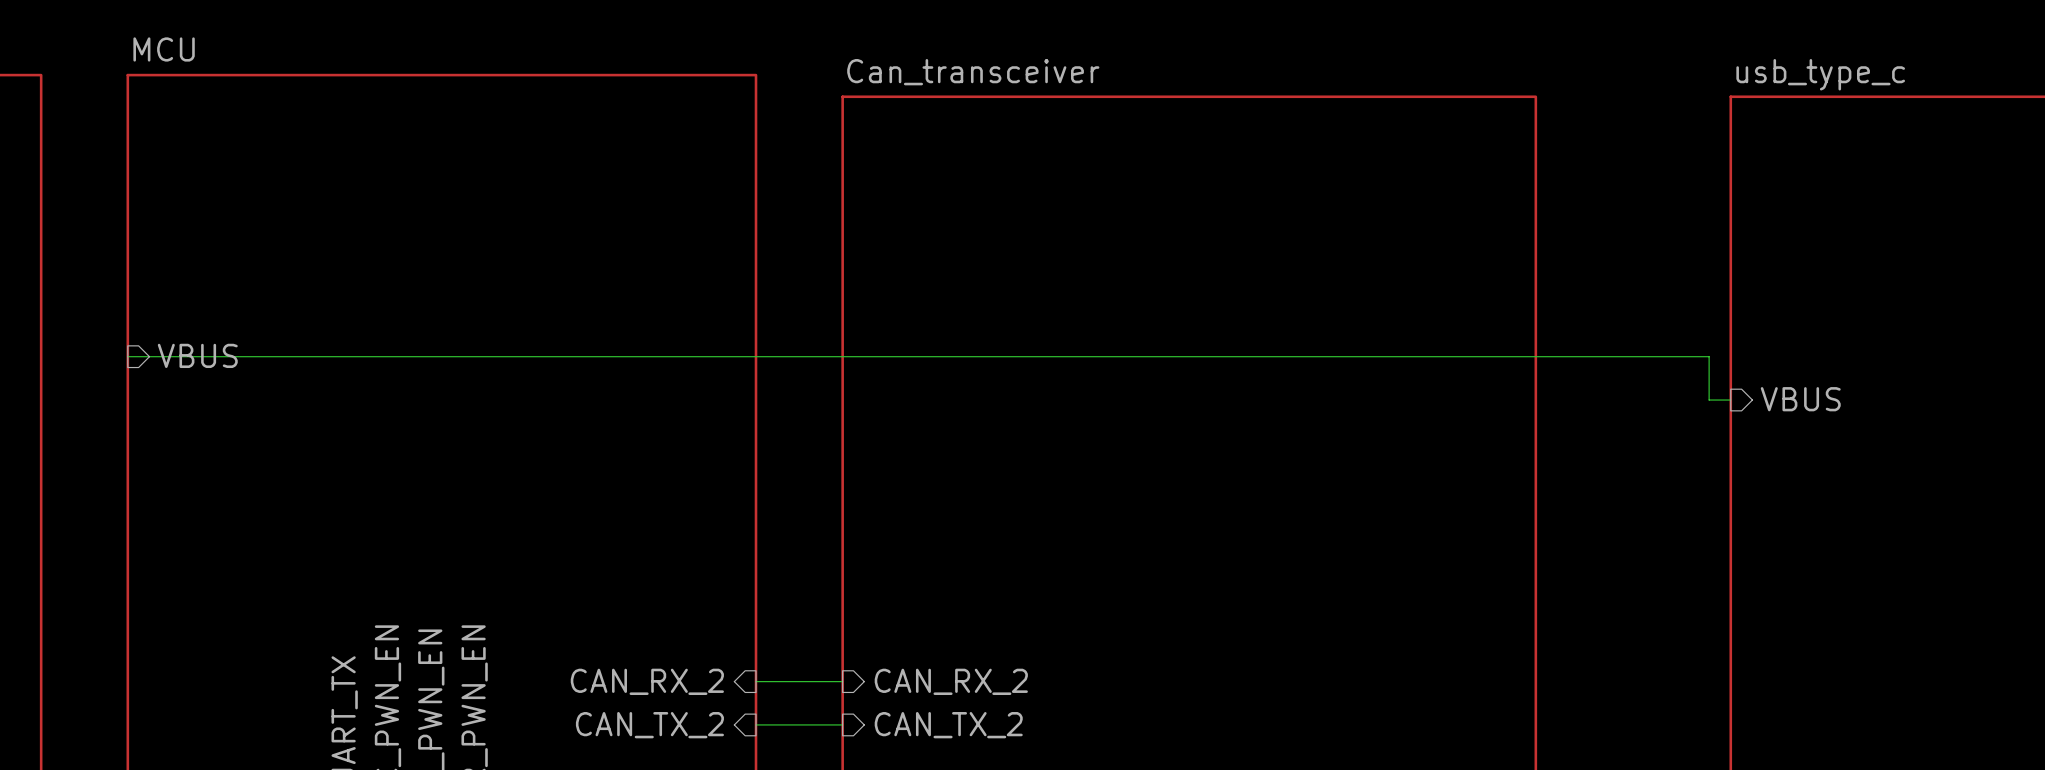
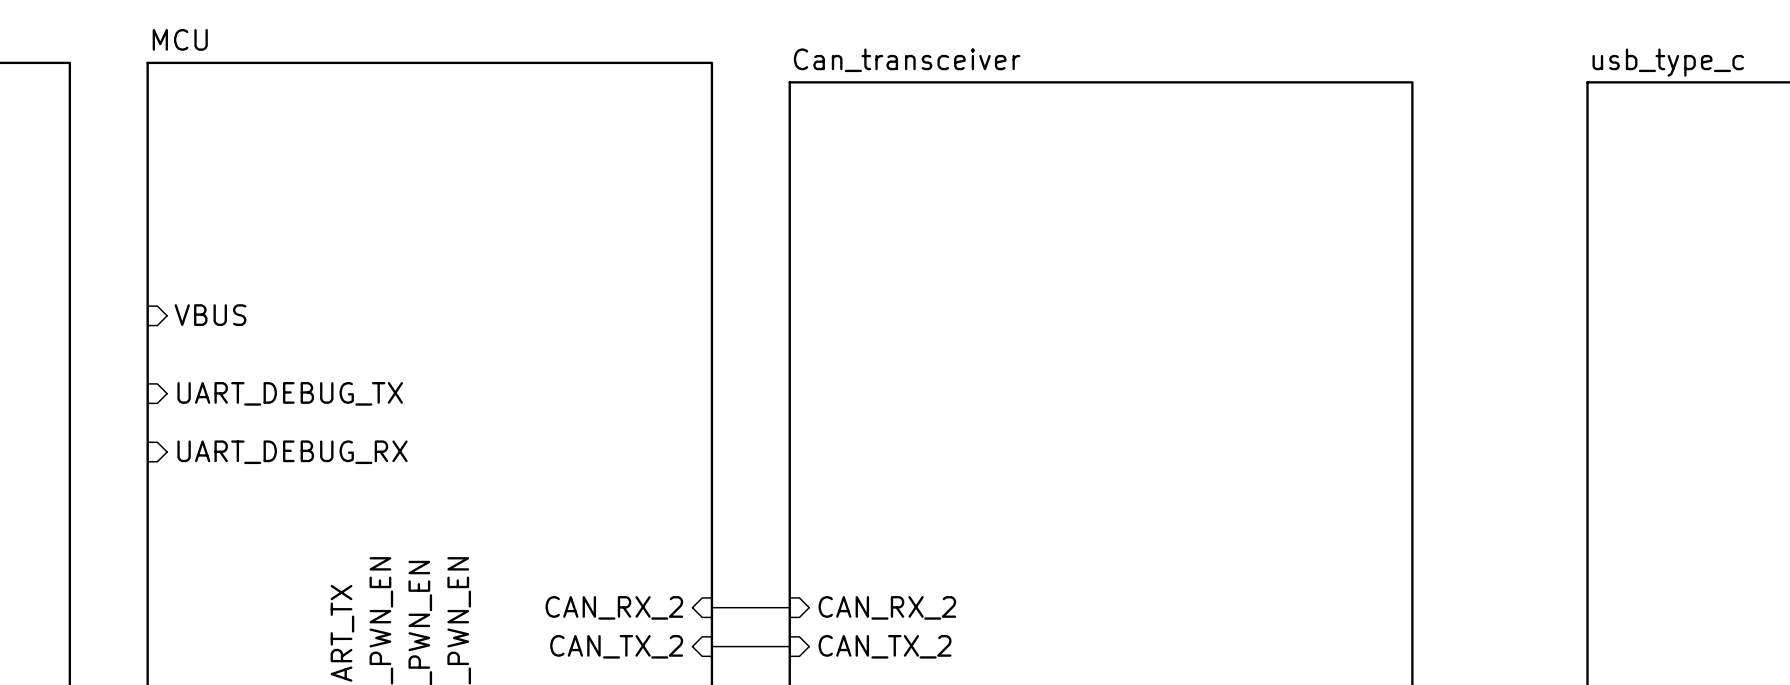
wire: (127, 356) (1709, 356) (1709, 400) (1730, 400) -> none
sheet pin: VBUS (1800, 399) -> none
sheet pin: none -> UART_DEBUG_TX (290, 393)
sheet pin: none -> UART_DEBUG_RX (292, 452)

